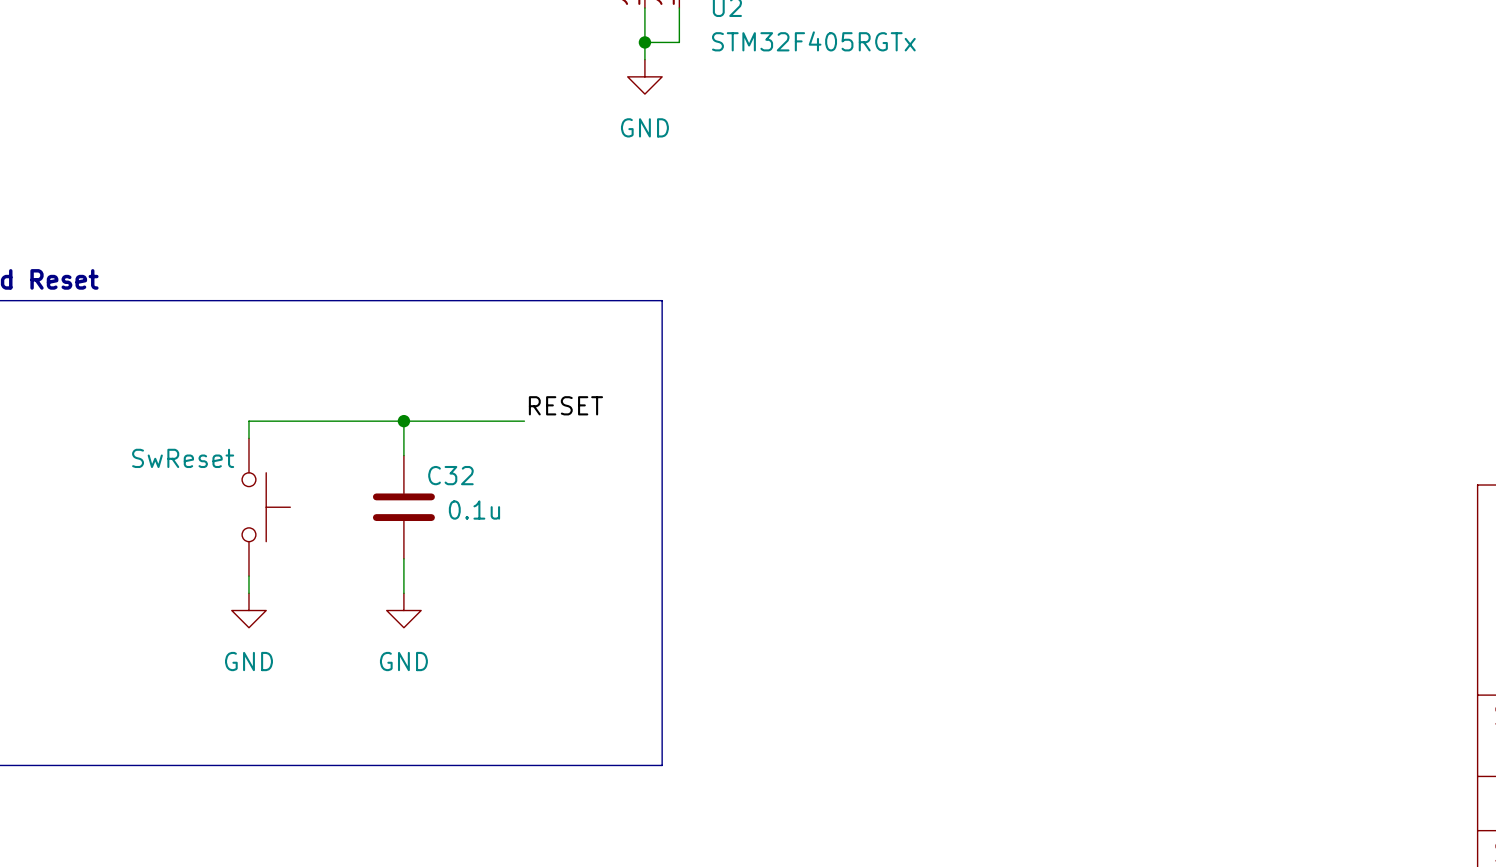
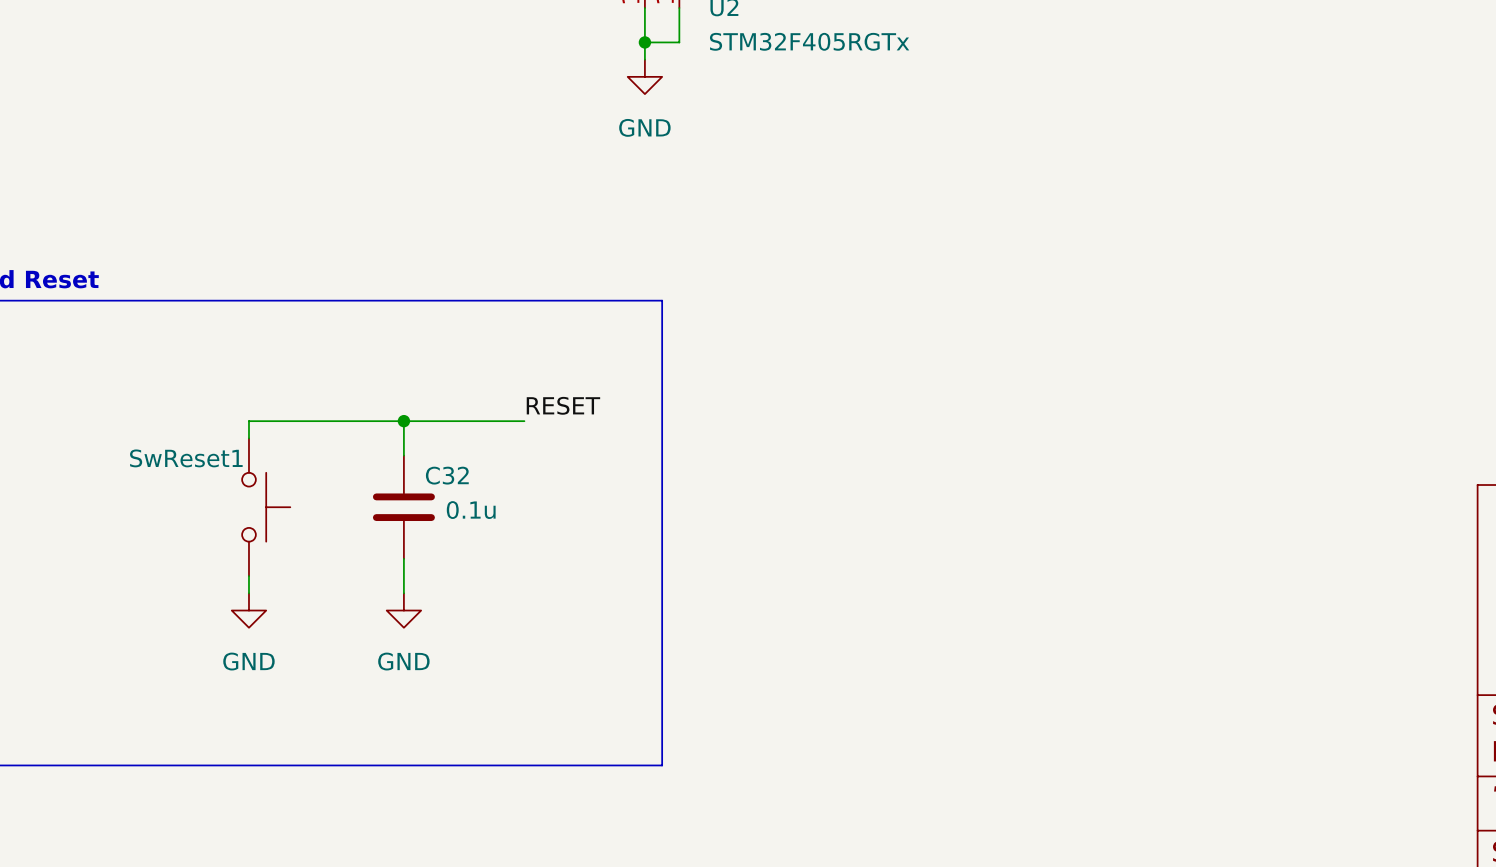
SwReset name: SwReset (183, 458) -> SwReset1 (186, 458)

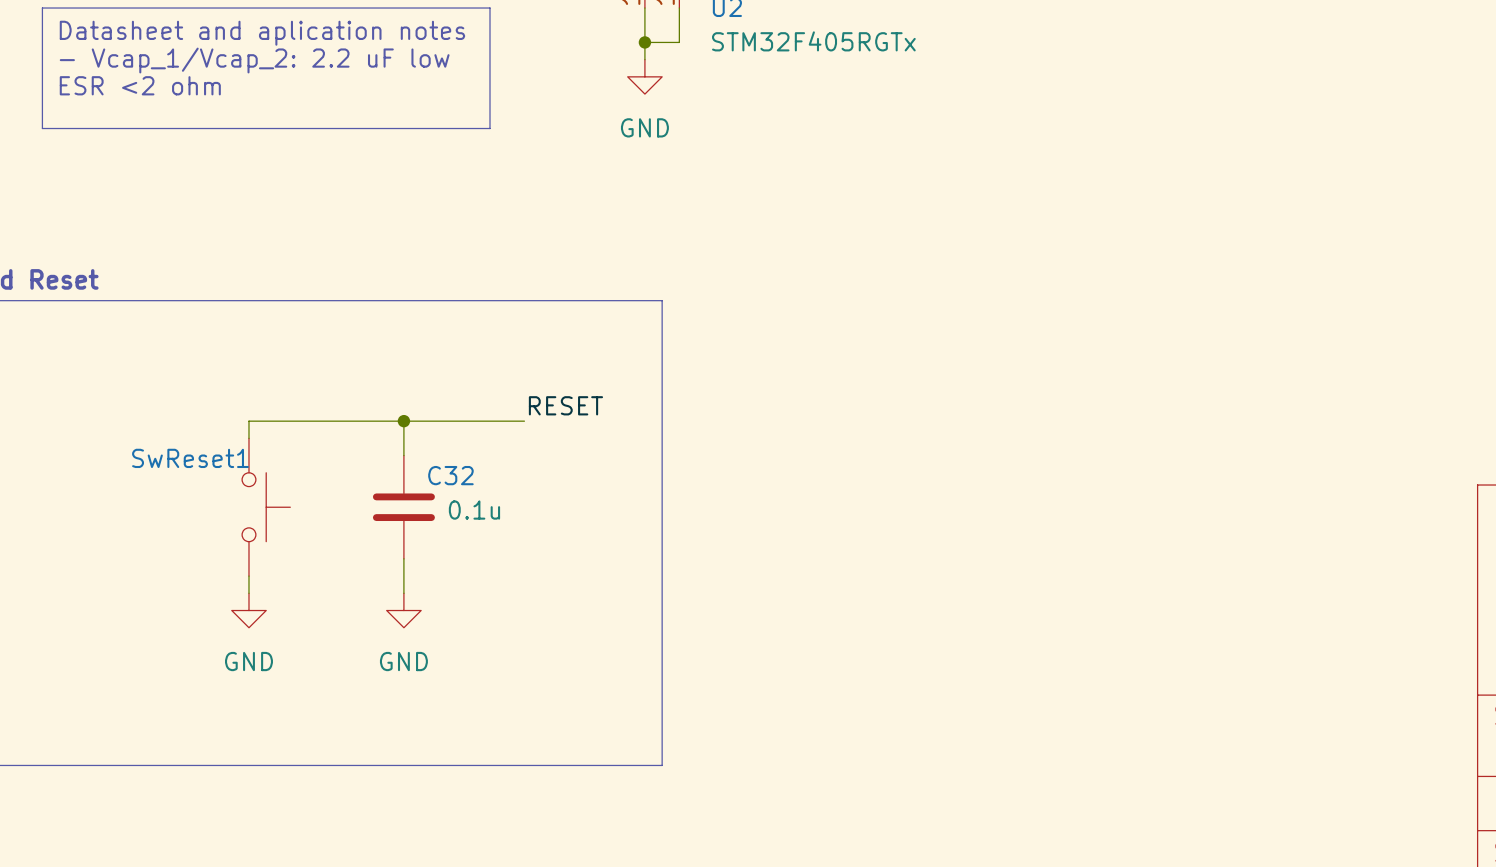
line: none -> (42, 8) (490, 8) (490, 128) (42, 128) (42, 8)
text: none -> Datasheet and aplication notes (262, 33)
text: none -> - Vcap_1/Vcap_2: 2.2 uF low (254, 60)
text: none -> ESR <2 ohm (140, 85)

